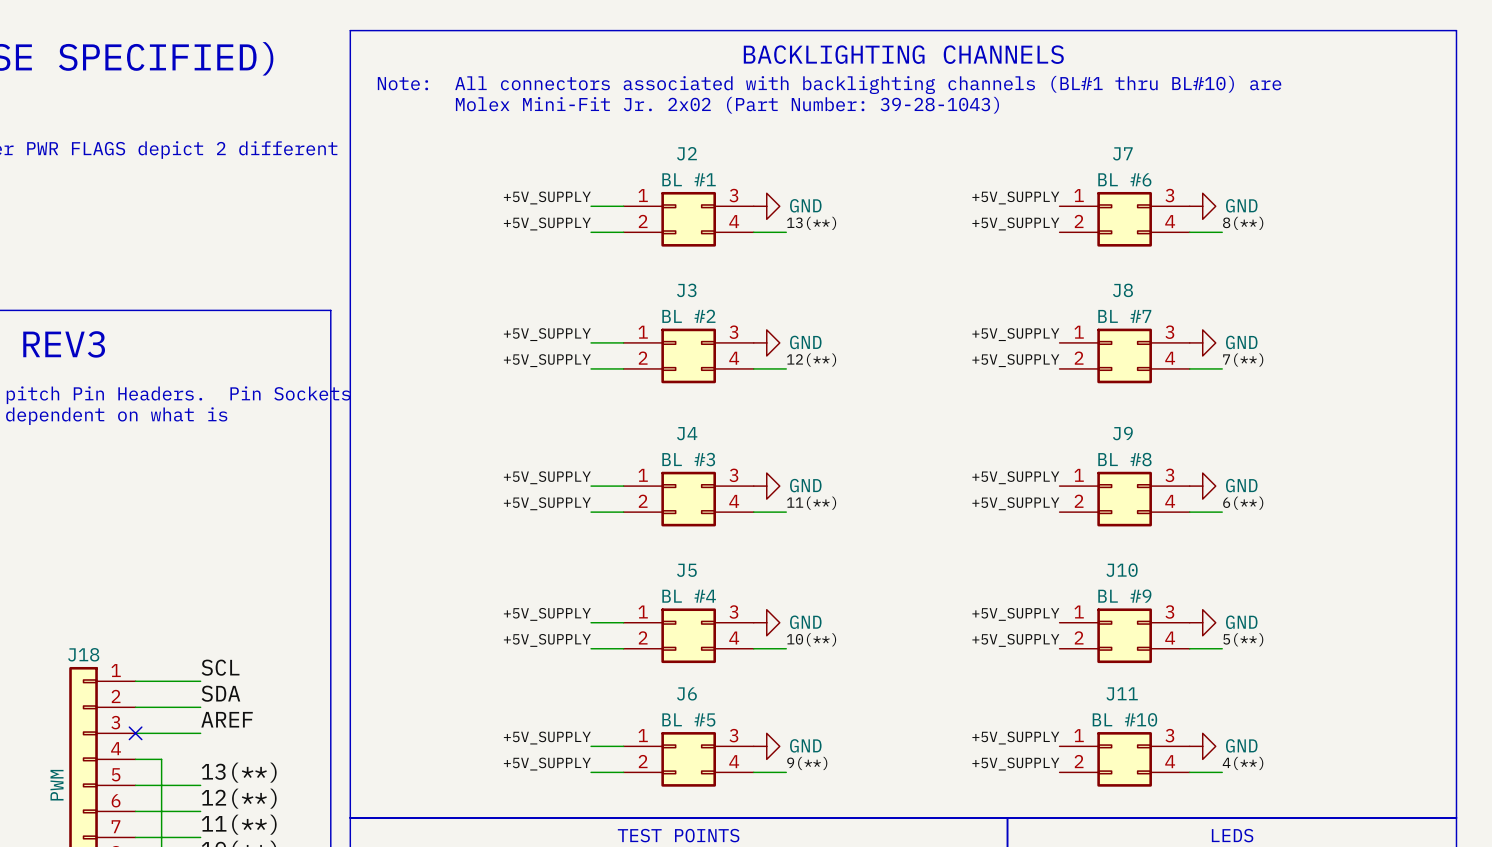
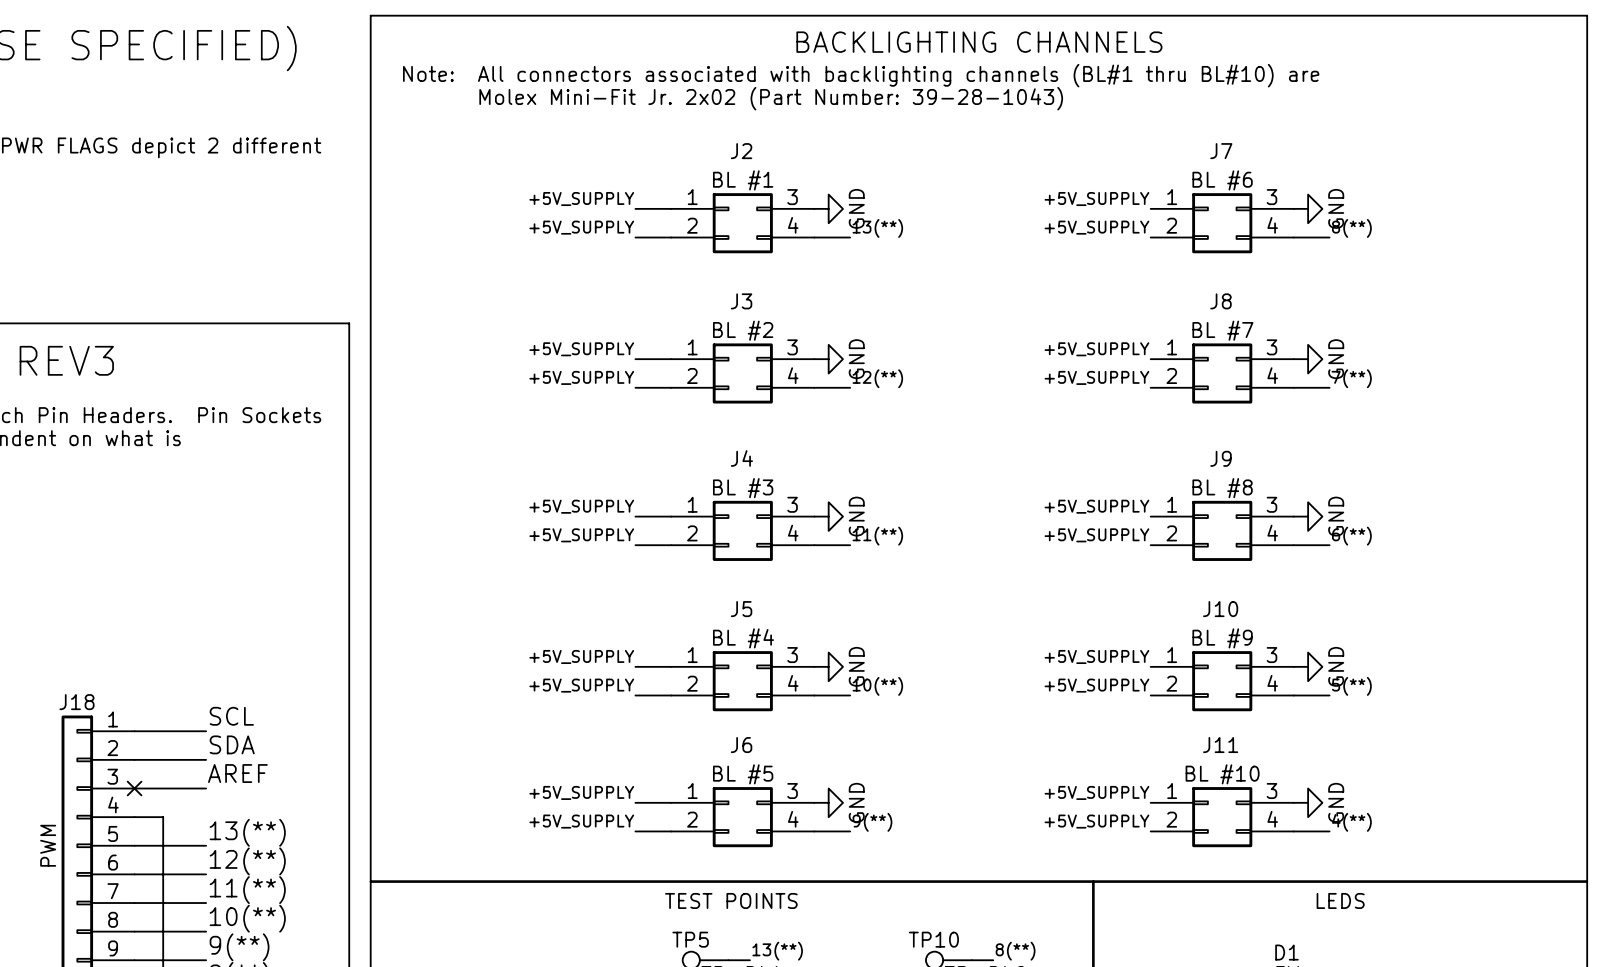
power symbol text rotation: 0° (805, 205) -> 90° counterclockwise (856, 208)
power symbol text rotation: 0° (1241, 205) -> 90° counterclockwise (1336, 208)
power symbol text rotation: 0° (805, 342) -> 90° counterclockwise (856, 359)
power symbol text rotation: 0° (1241, 342) -> 90° counterclockwise (1336, 359)
power symbol text rotation: 0° (805, 485) -> 90° counterclockwise (856, 516)
power symbol text rotation: 0° (1241, 485) -> 90° counterclockwise (1336, 516)
power symbol text rotation: 0° (805, 622) -> 90° counterclockwise (856, 666)
power symbol text rotation: 0° (1241, 622) -> 90° counterclockwise (1336, 666)
power symbol text rotation: 0° (805, 745) -> 90° counterclockwise (856, 802)
power symbol text rotation: 0° (1241, 745) -> 90° counterclockwise (1336, 802)

